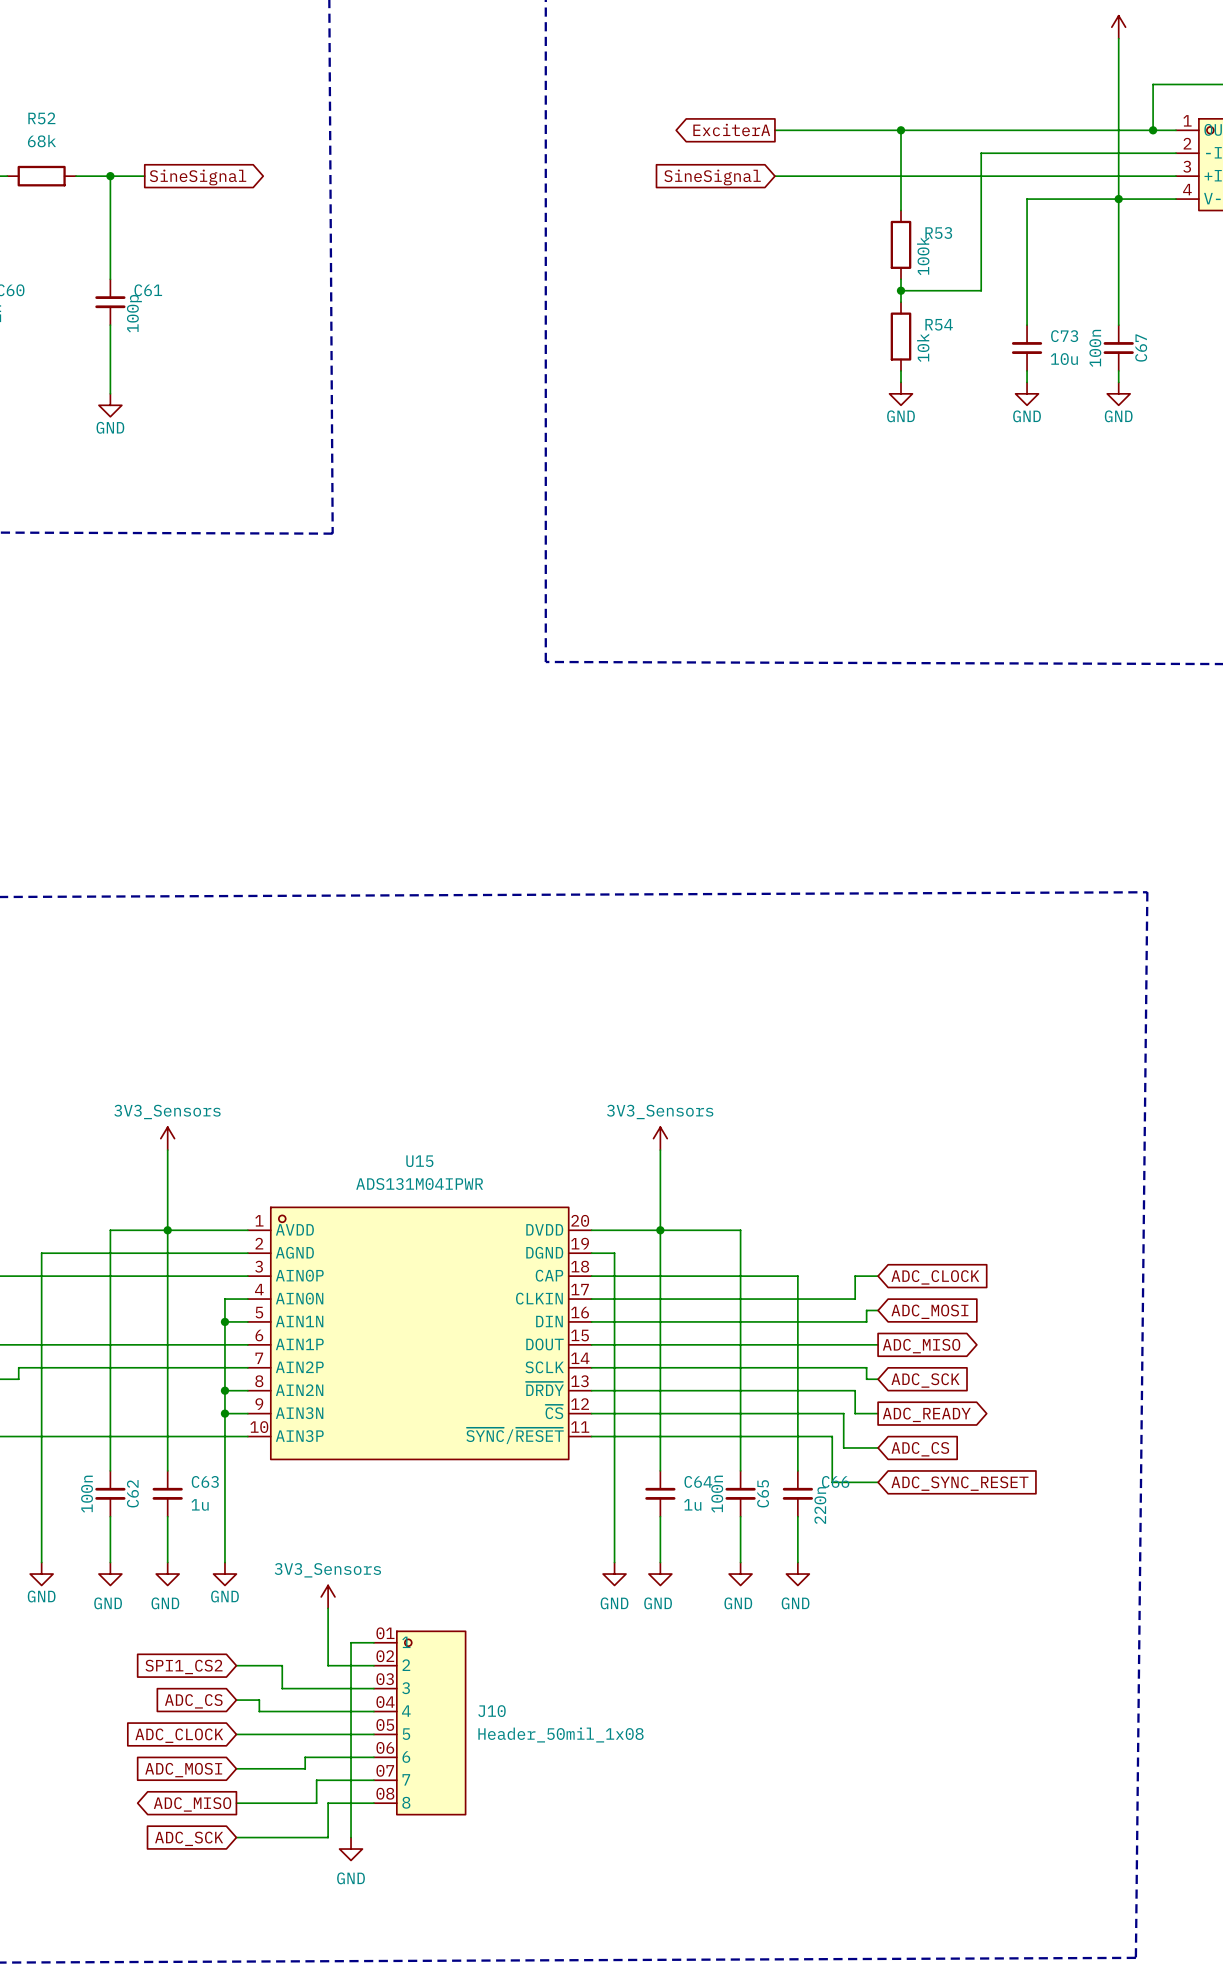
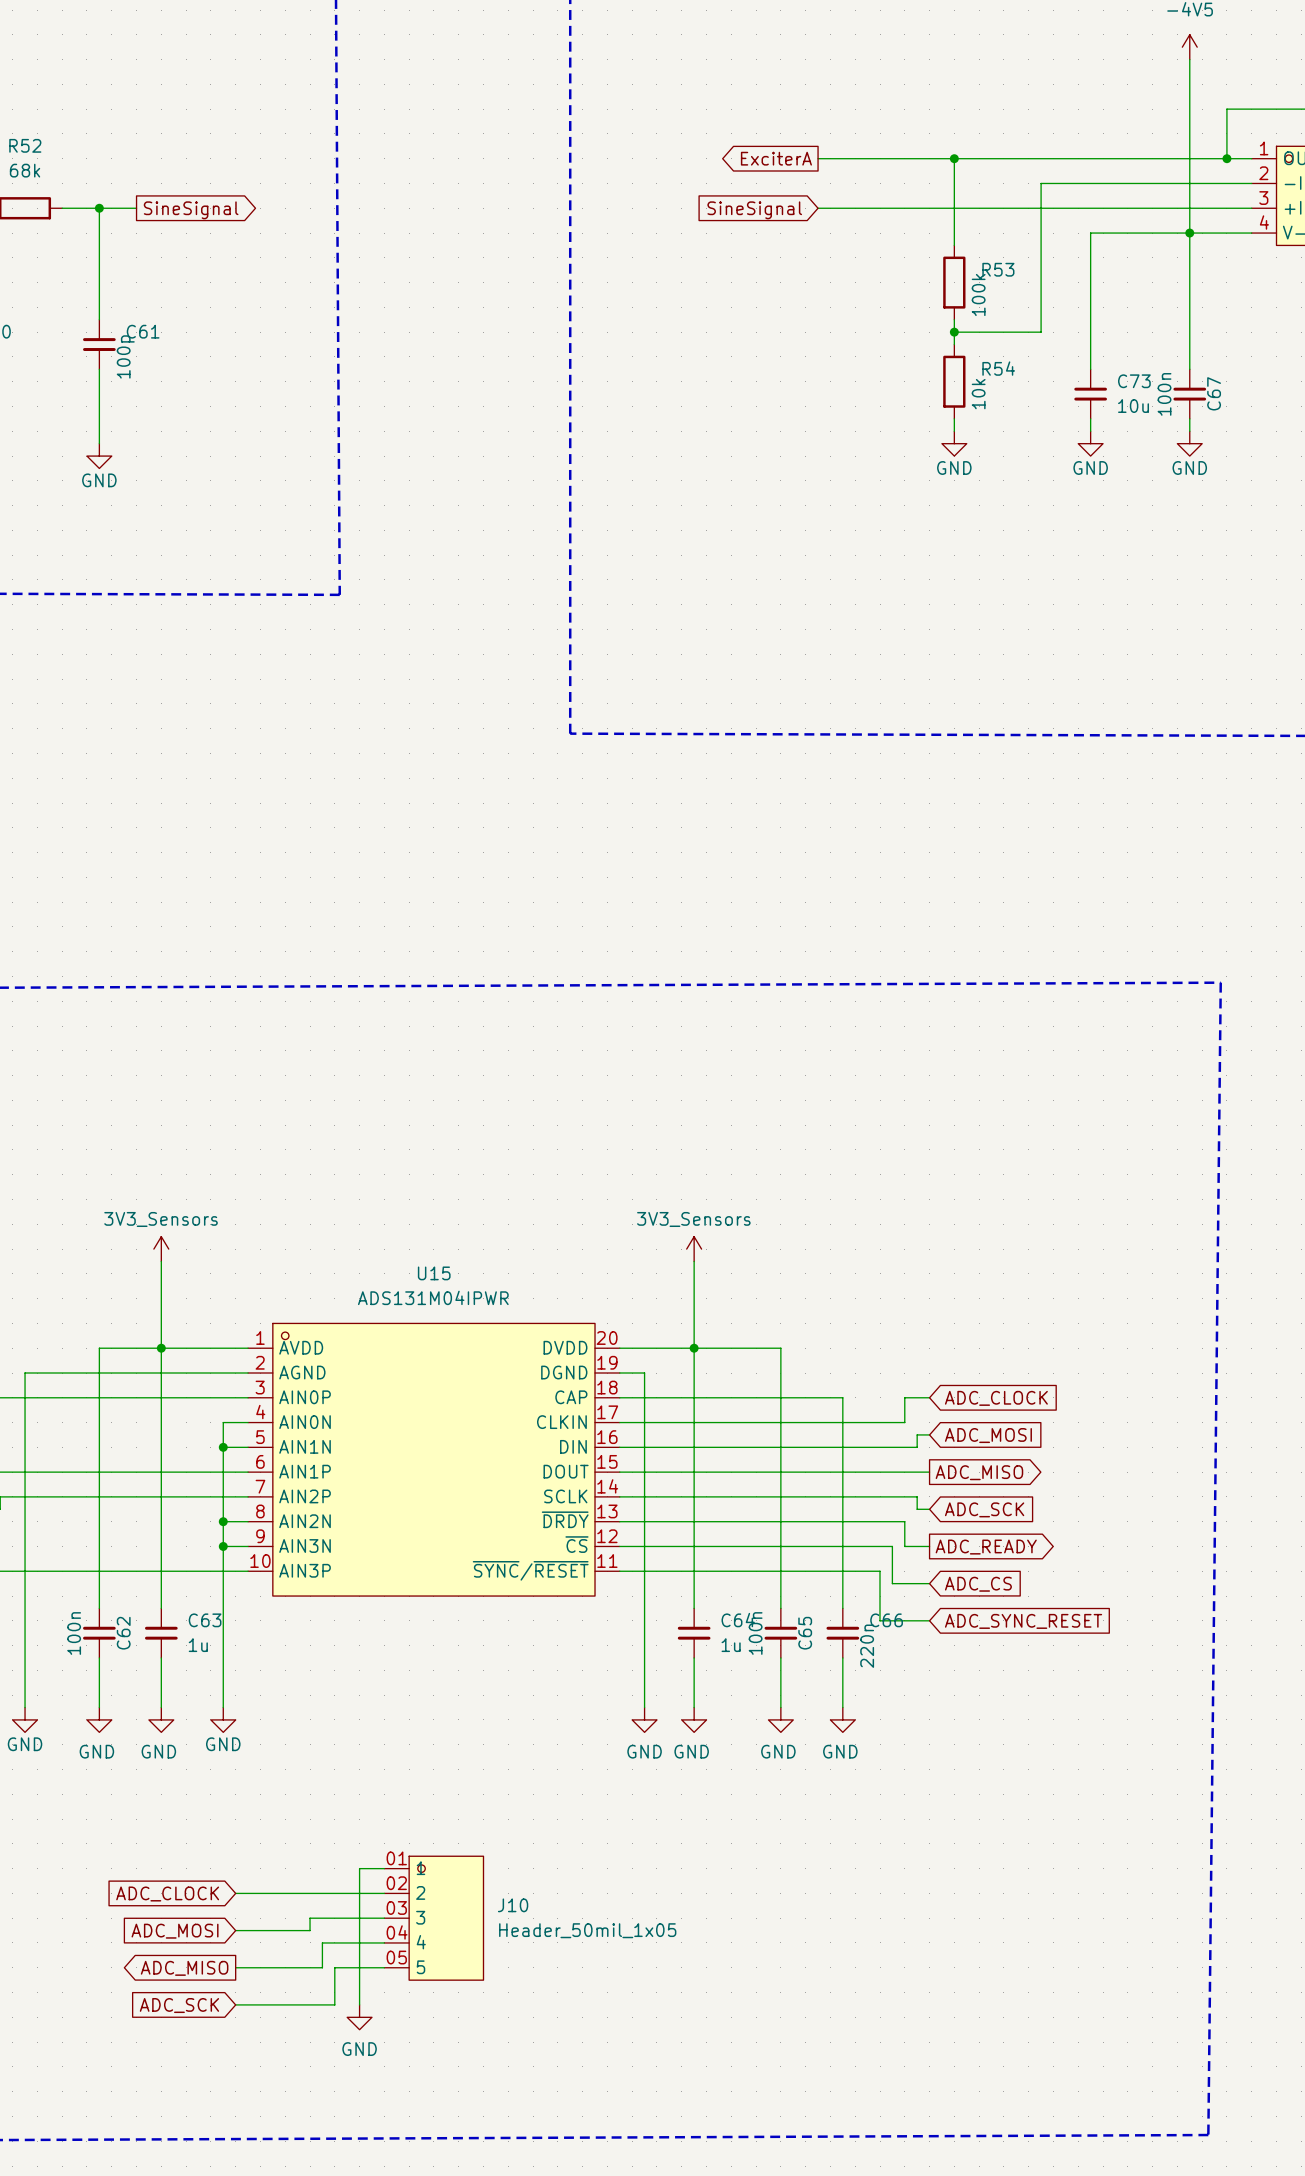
power symbol: 3V3_Sensors (328, 1596) -> none
wire: (328, 1608) (328, 1665) (373, 1665) -> none
J10 symbol: [373, 1631, 466, 1815] -> [384, 1856, 484, 1981]
wire: (373, 1642) (351, 1642) (351, 1711) (259, 1711) (259, 1700) (236, 1700) -> none
wire: (236, 1665) (282, 1665) (282, 1688) (373, 1688) -> none
global label: SPI1_CS2 (183, 1666) -> none
global label: ADC_CS (193, 1701) -> none
J10 value: Header_50mil_1x08 (560, 1734) -> Header_50mil_1x05 (587, 1930)

